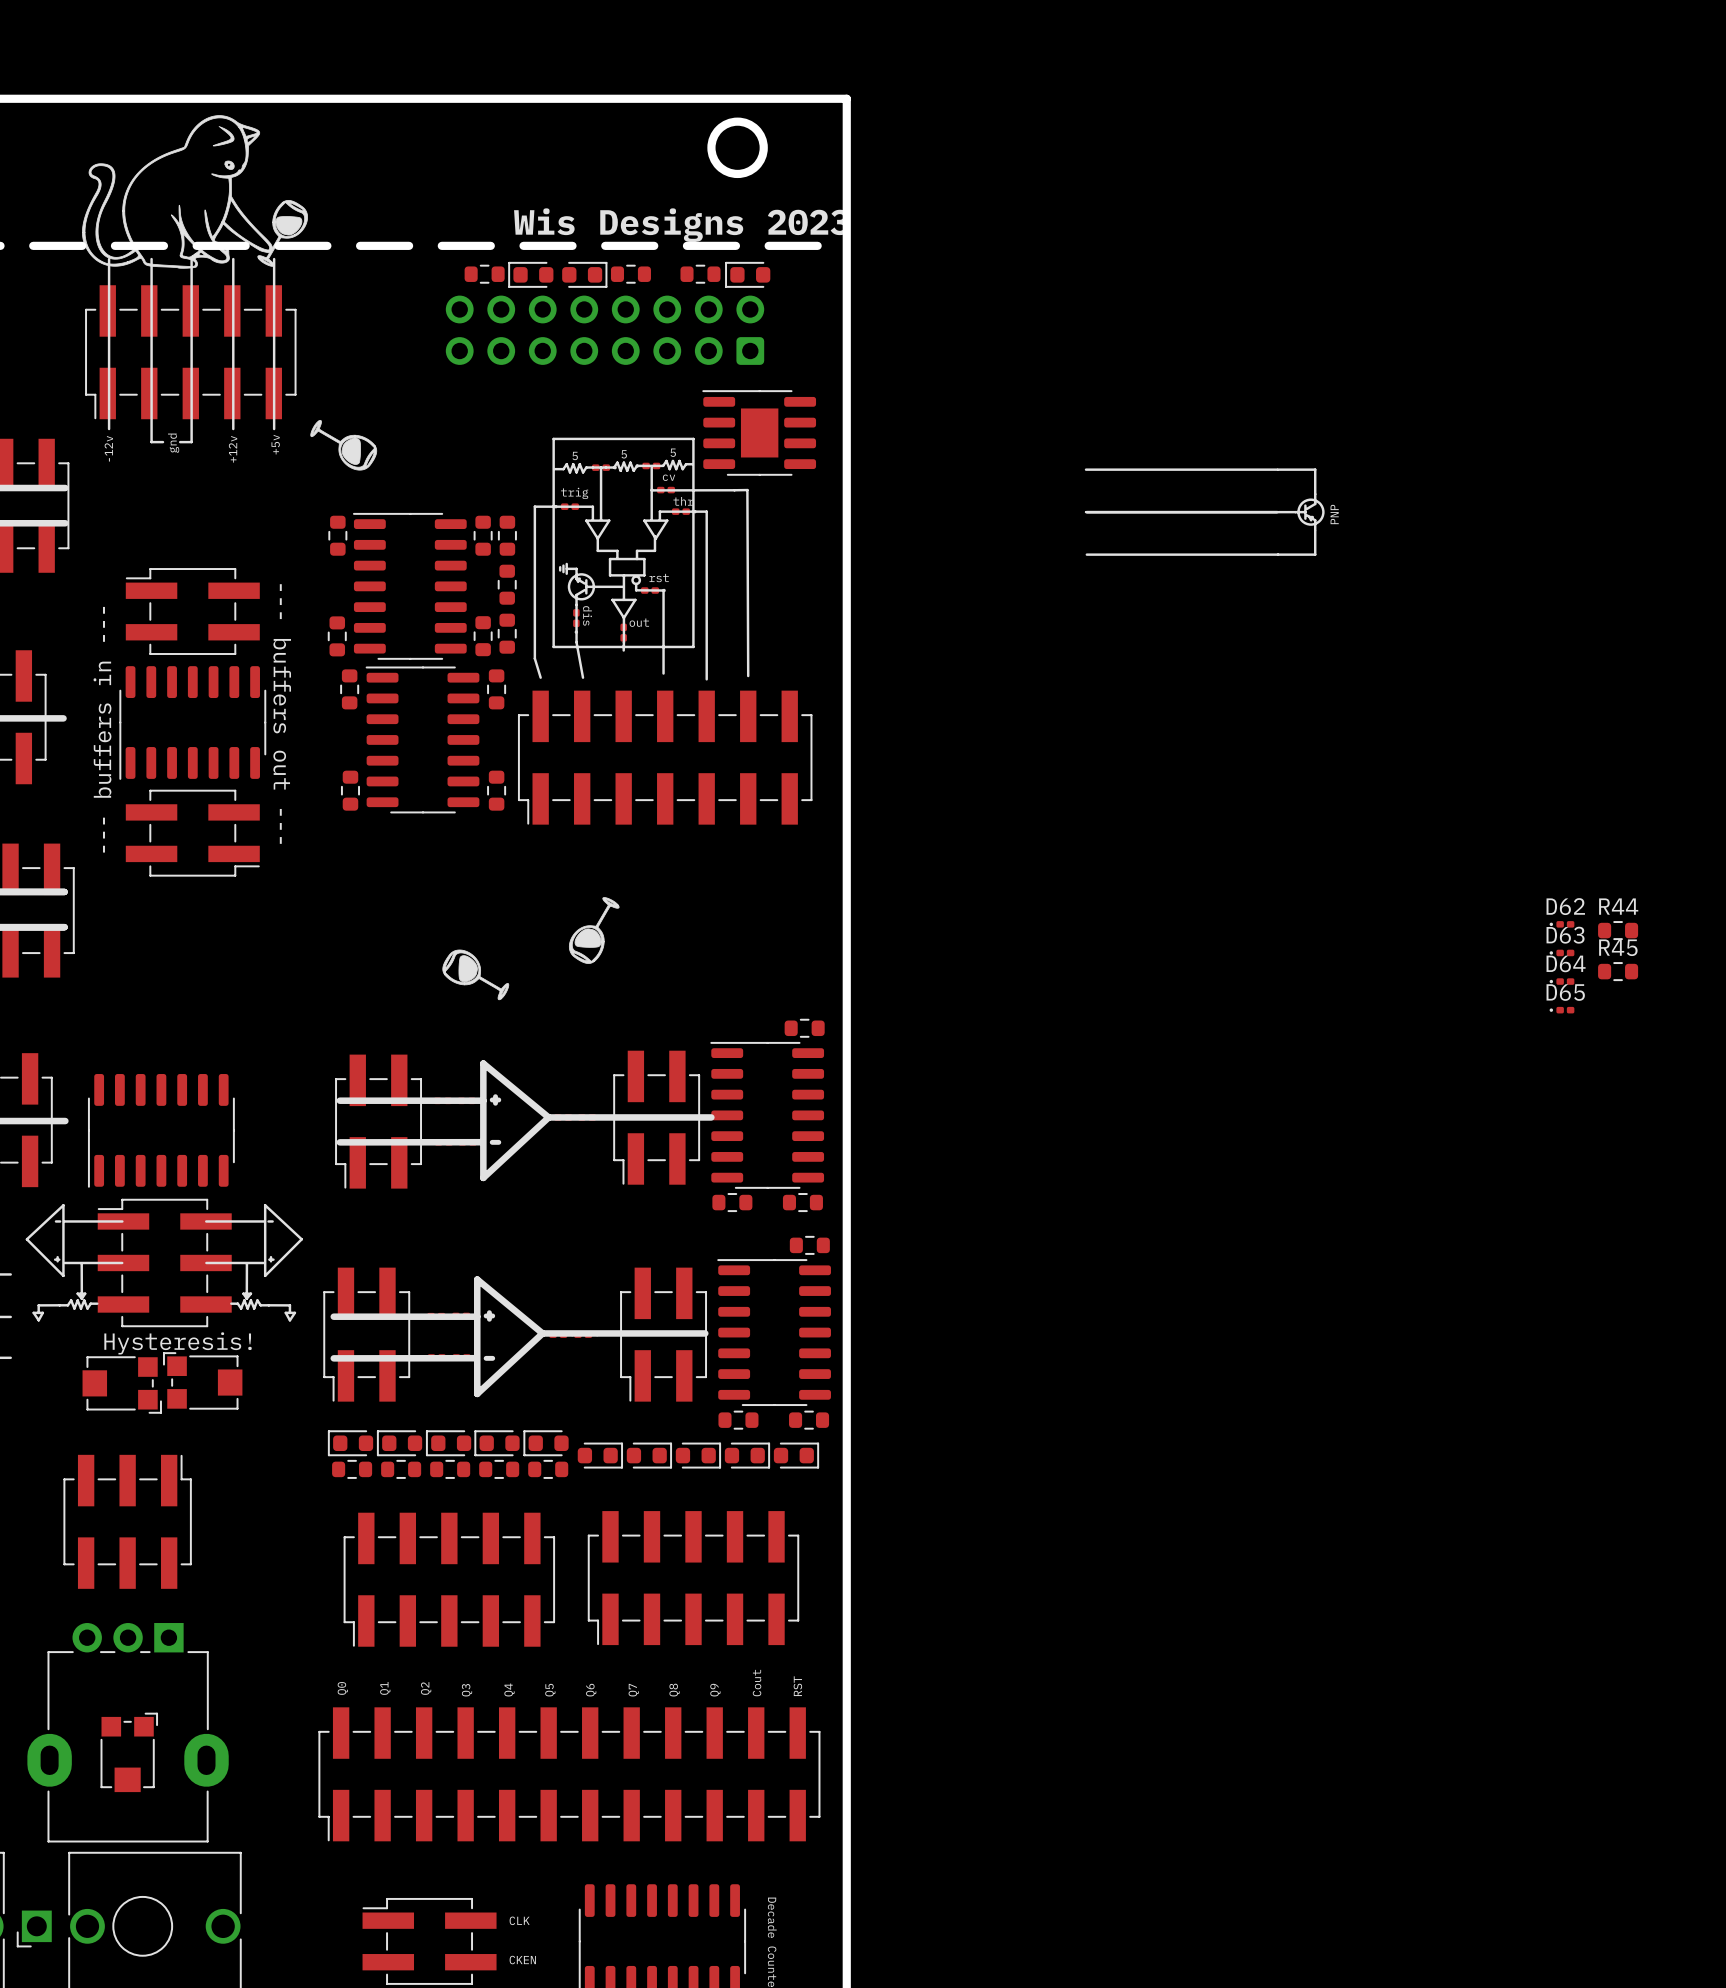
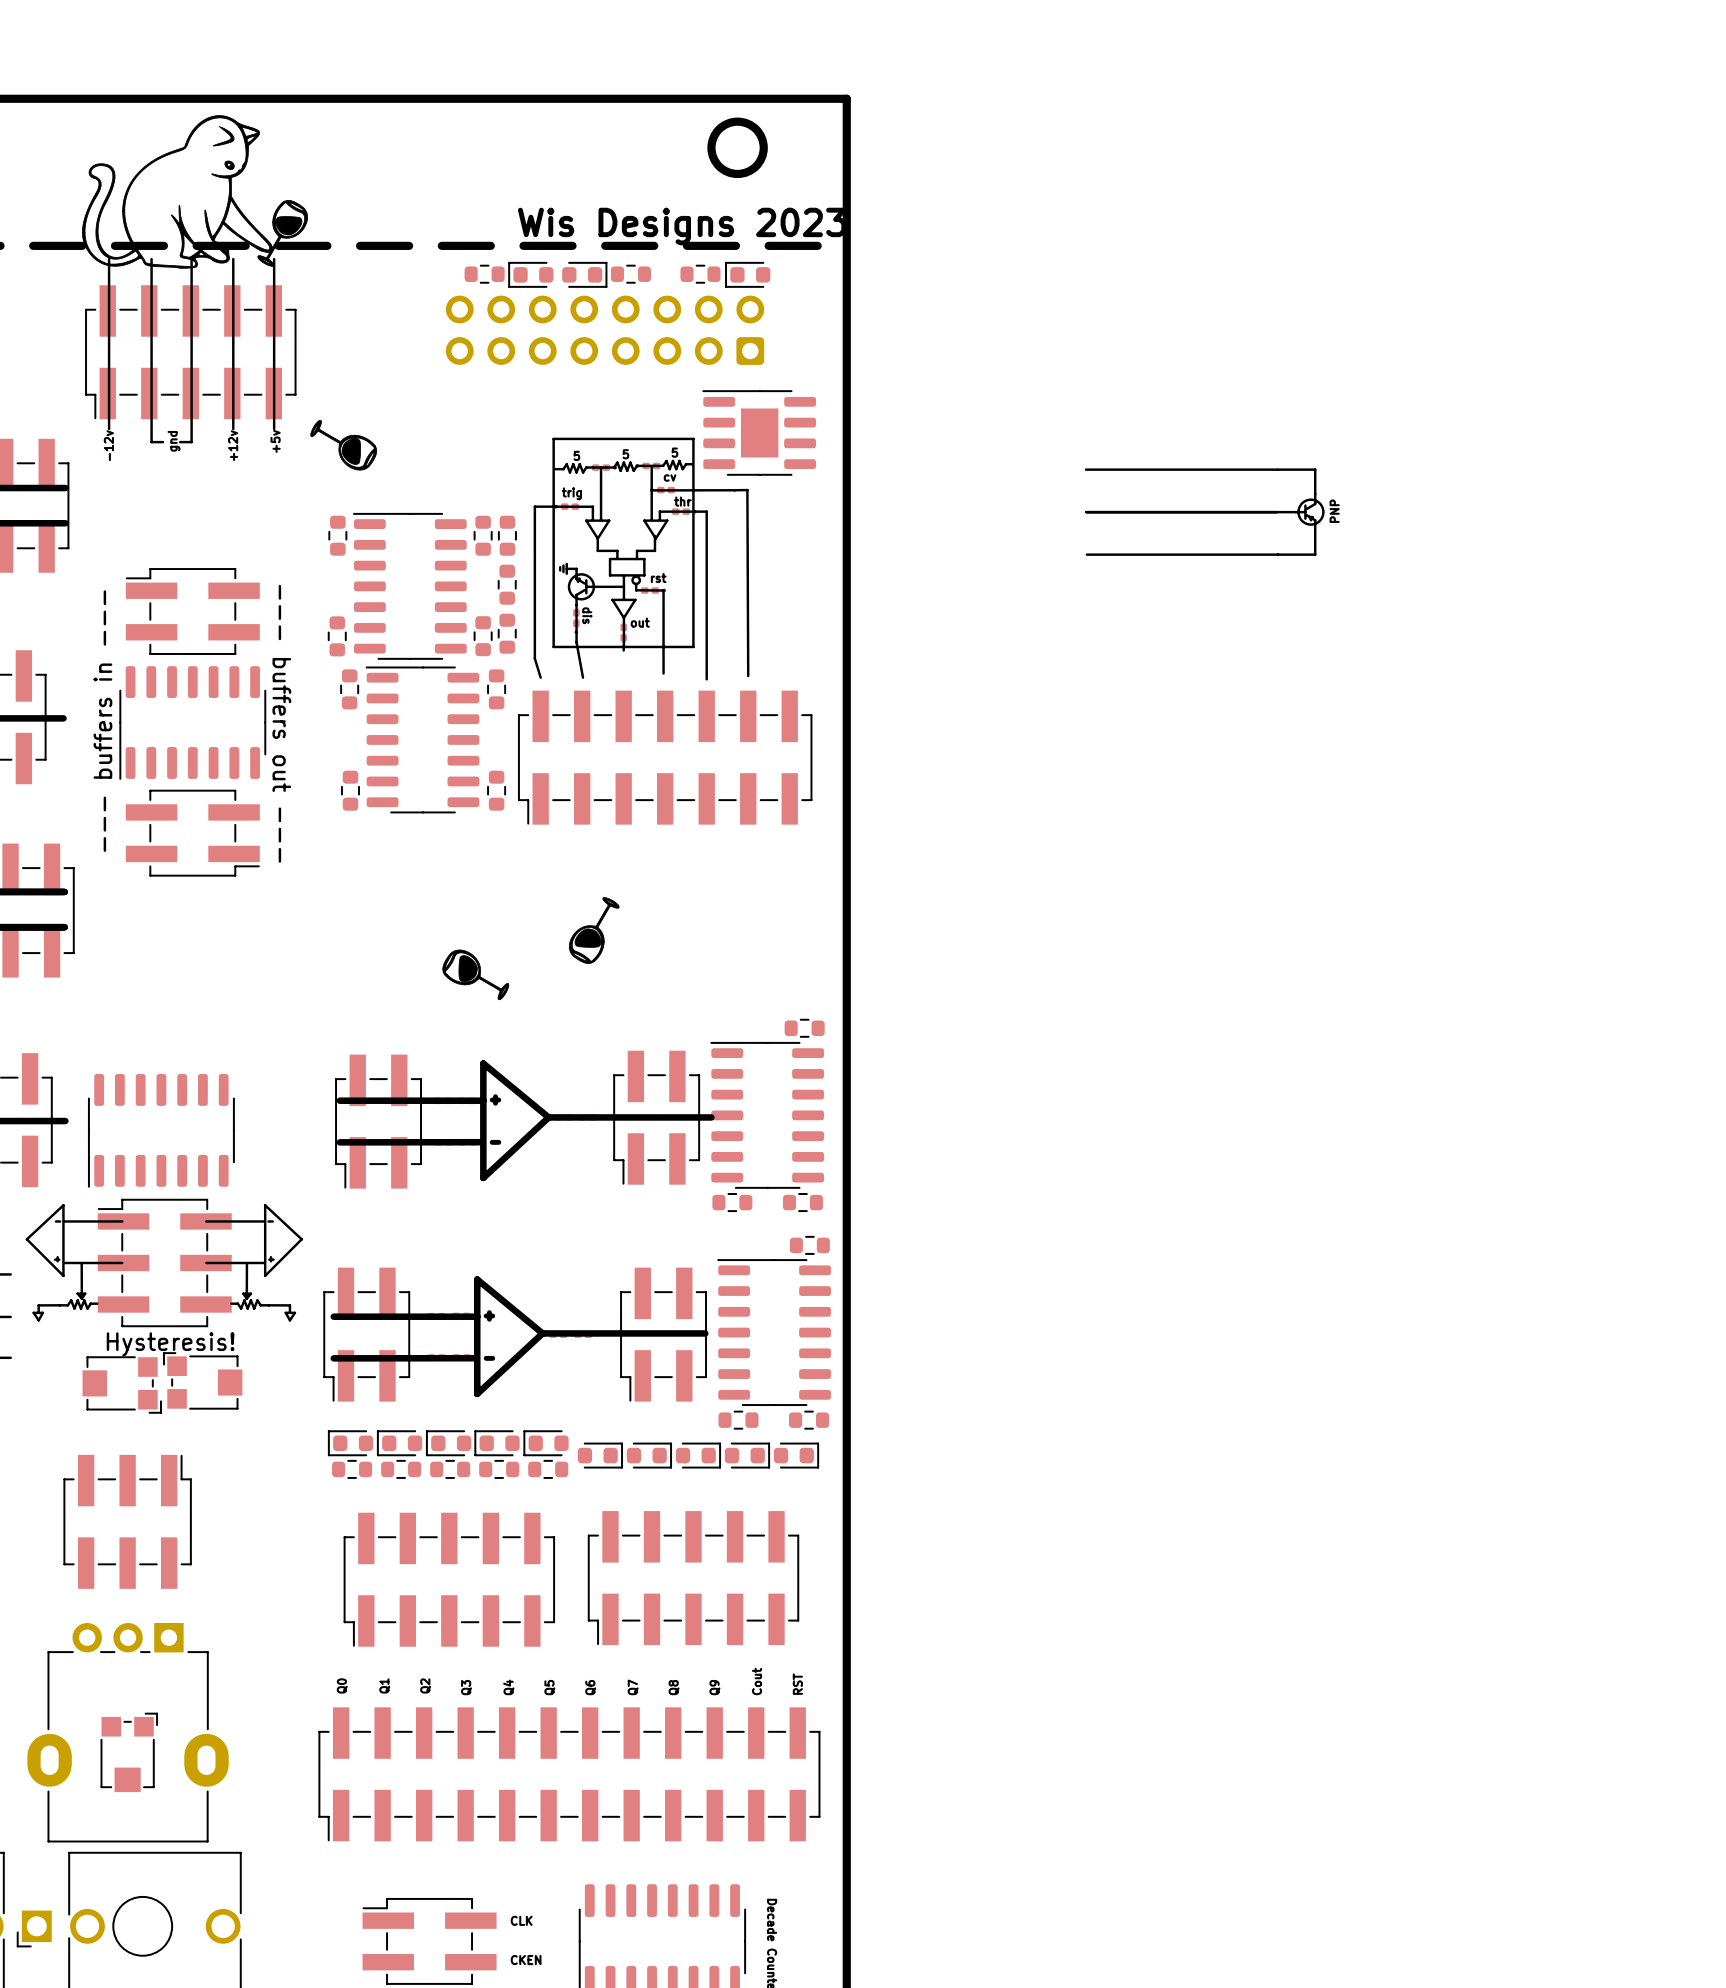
D62: (1562, 924) -> none
R44: (1618, 930) -> none
D63: (1562, 952) -> none
R45: (1618, 971) -> none
D64: (1562, 981) -> none
D65: (1562, 1010) -> none

